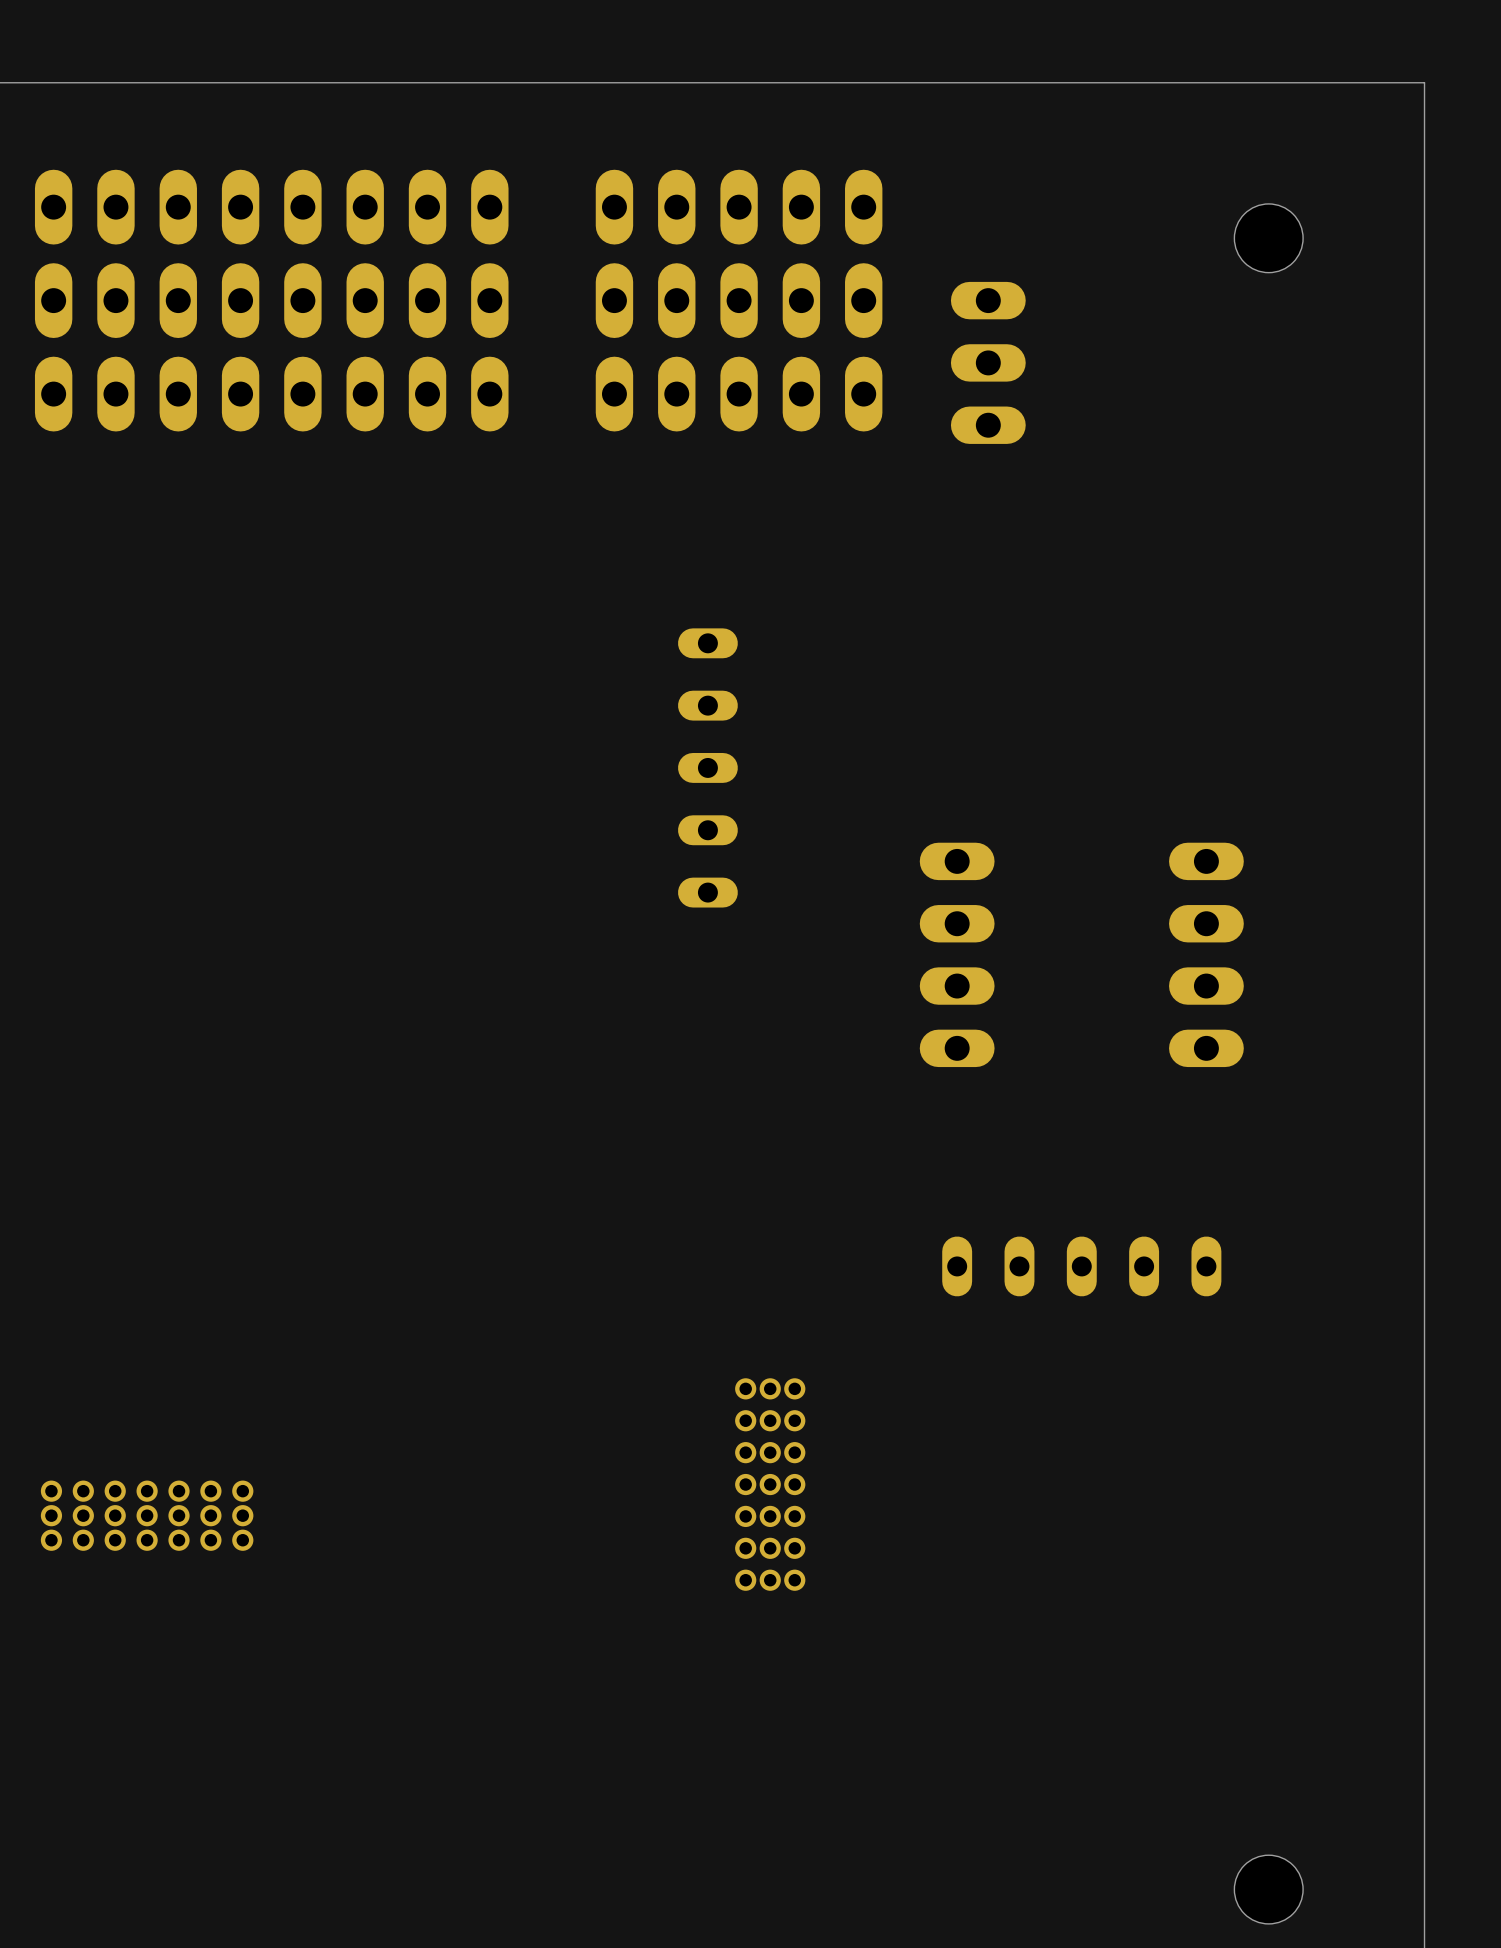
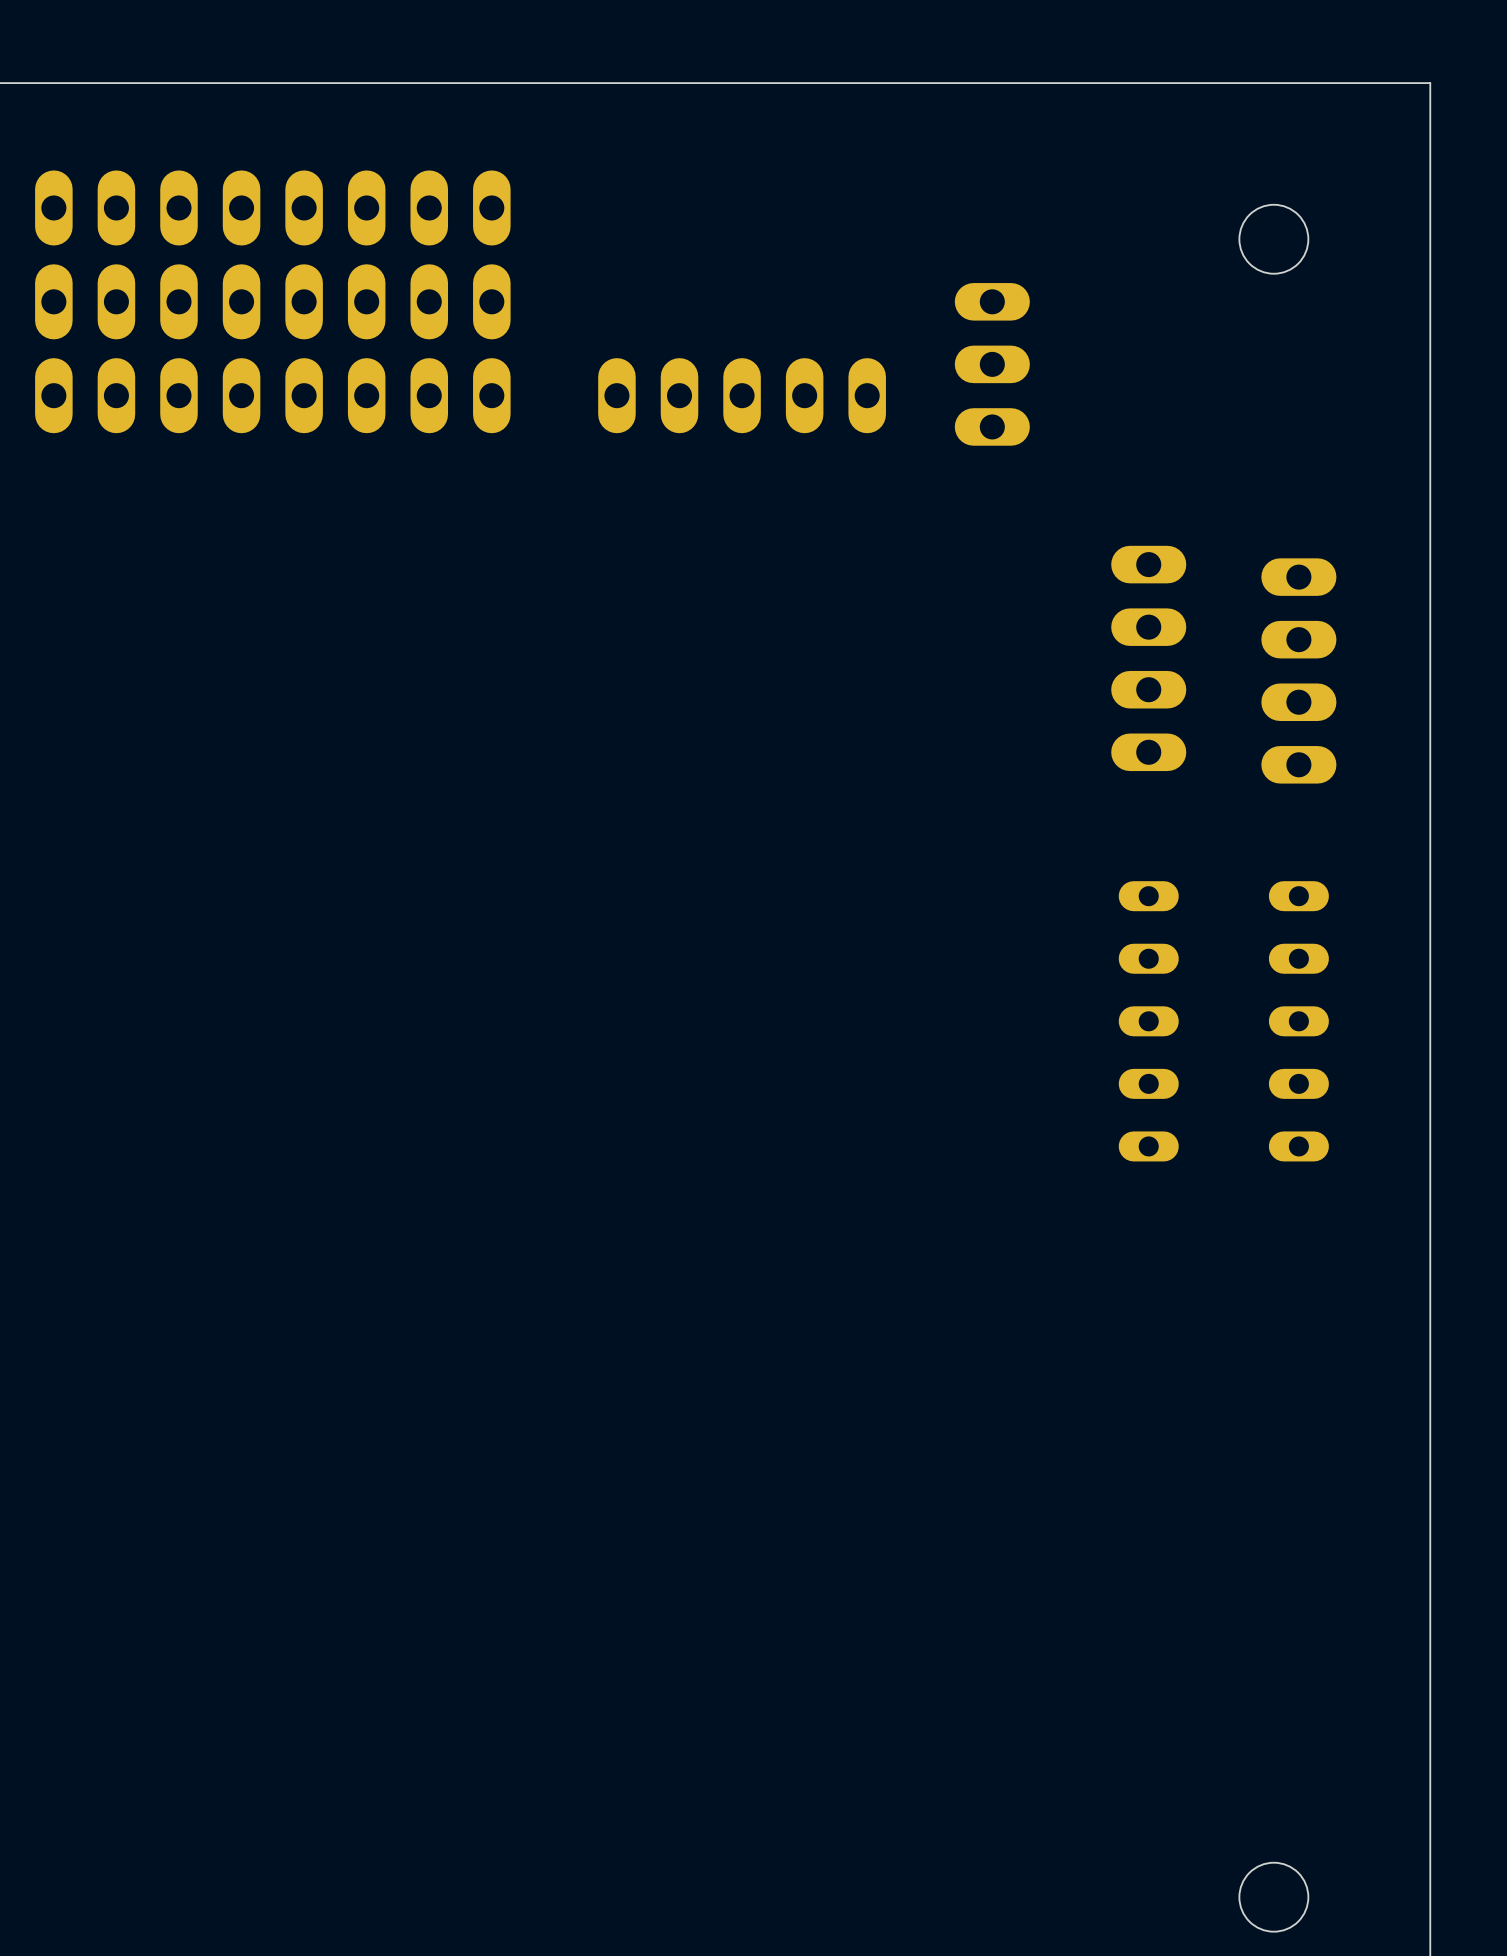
part: (739, 207) -> none
part: (739, 300) -> none
part: none -> (1148, 658)
part: none -> (1298, 670)
part: (707, 767) -> none
part: (957, 954) -> none
part: (1206, 954) -> none
part: none -> (1148, 1021)
part: none -> (1298, 1021)
part: (1081, 1266) -> none
part: (770, 1484) -> none
part: (147, 1515) -> none

